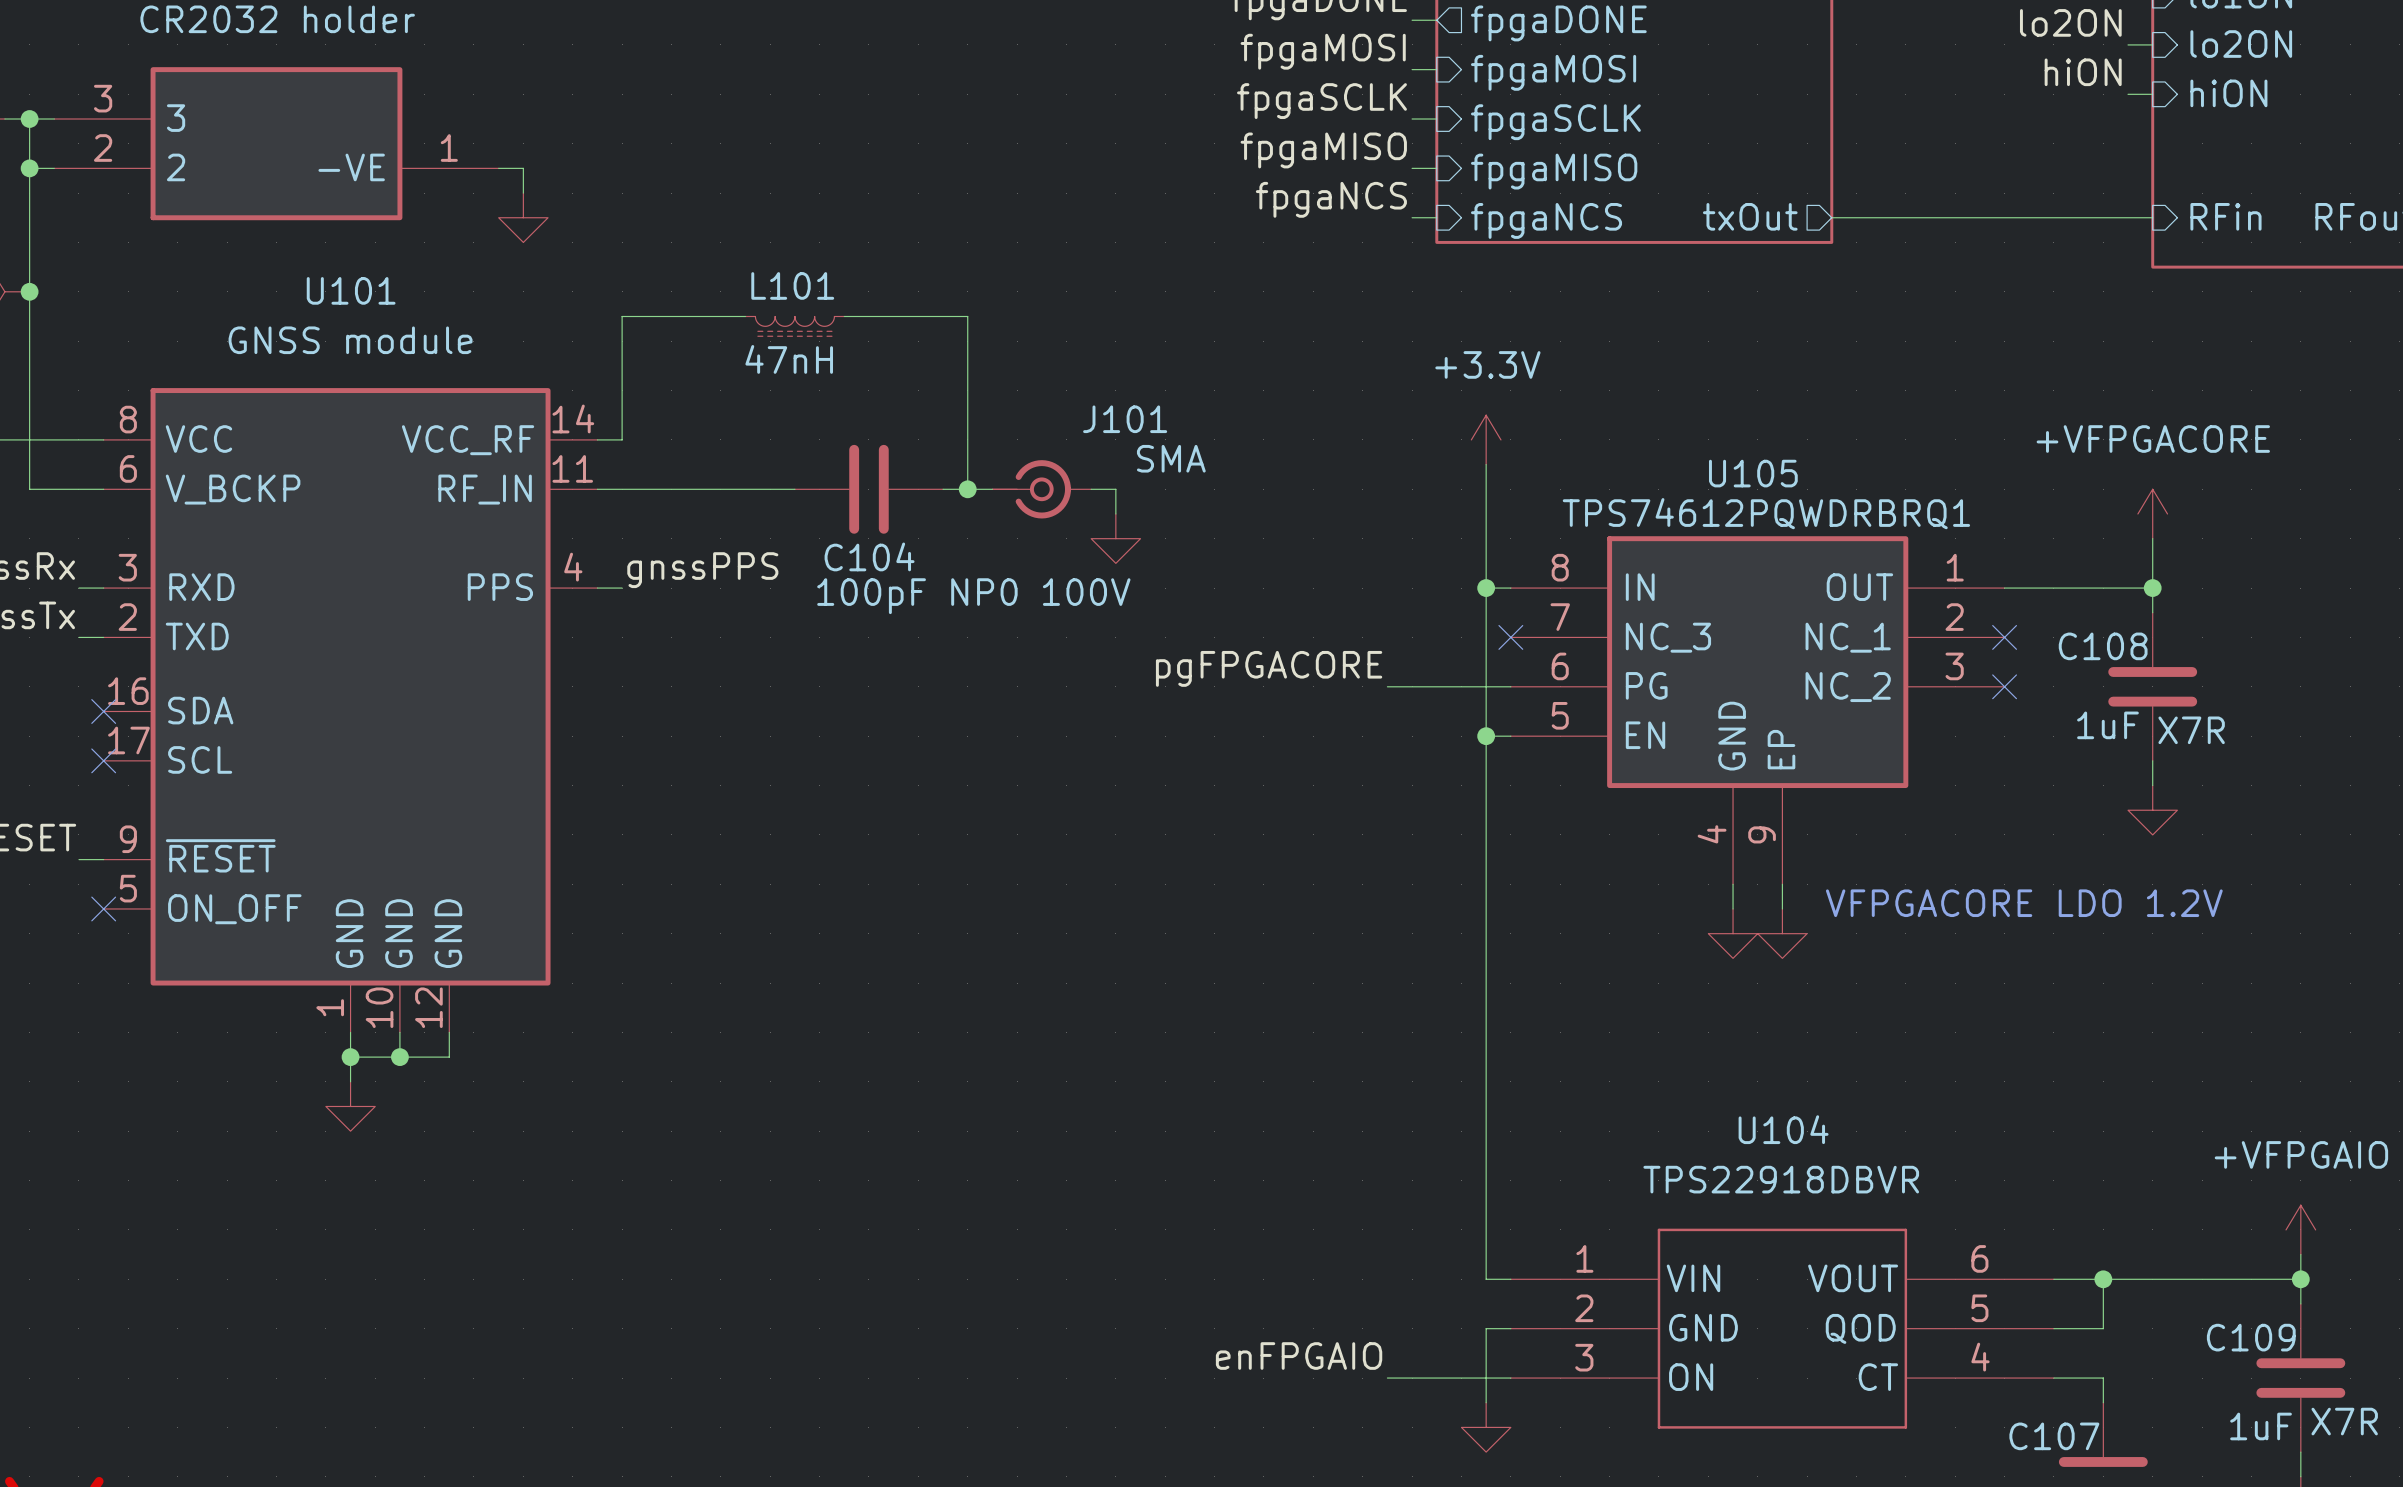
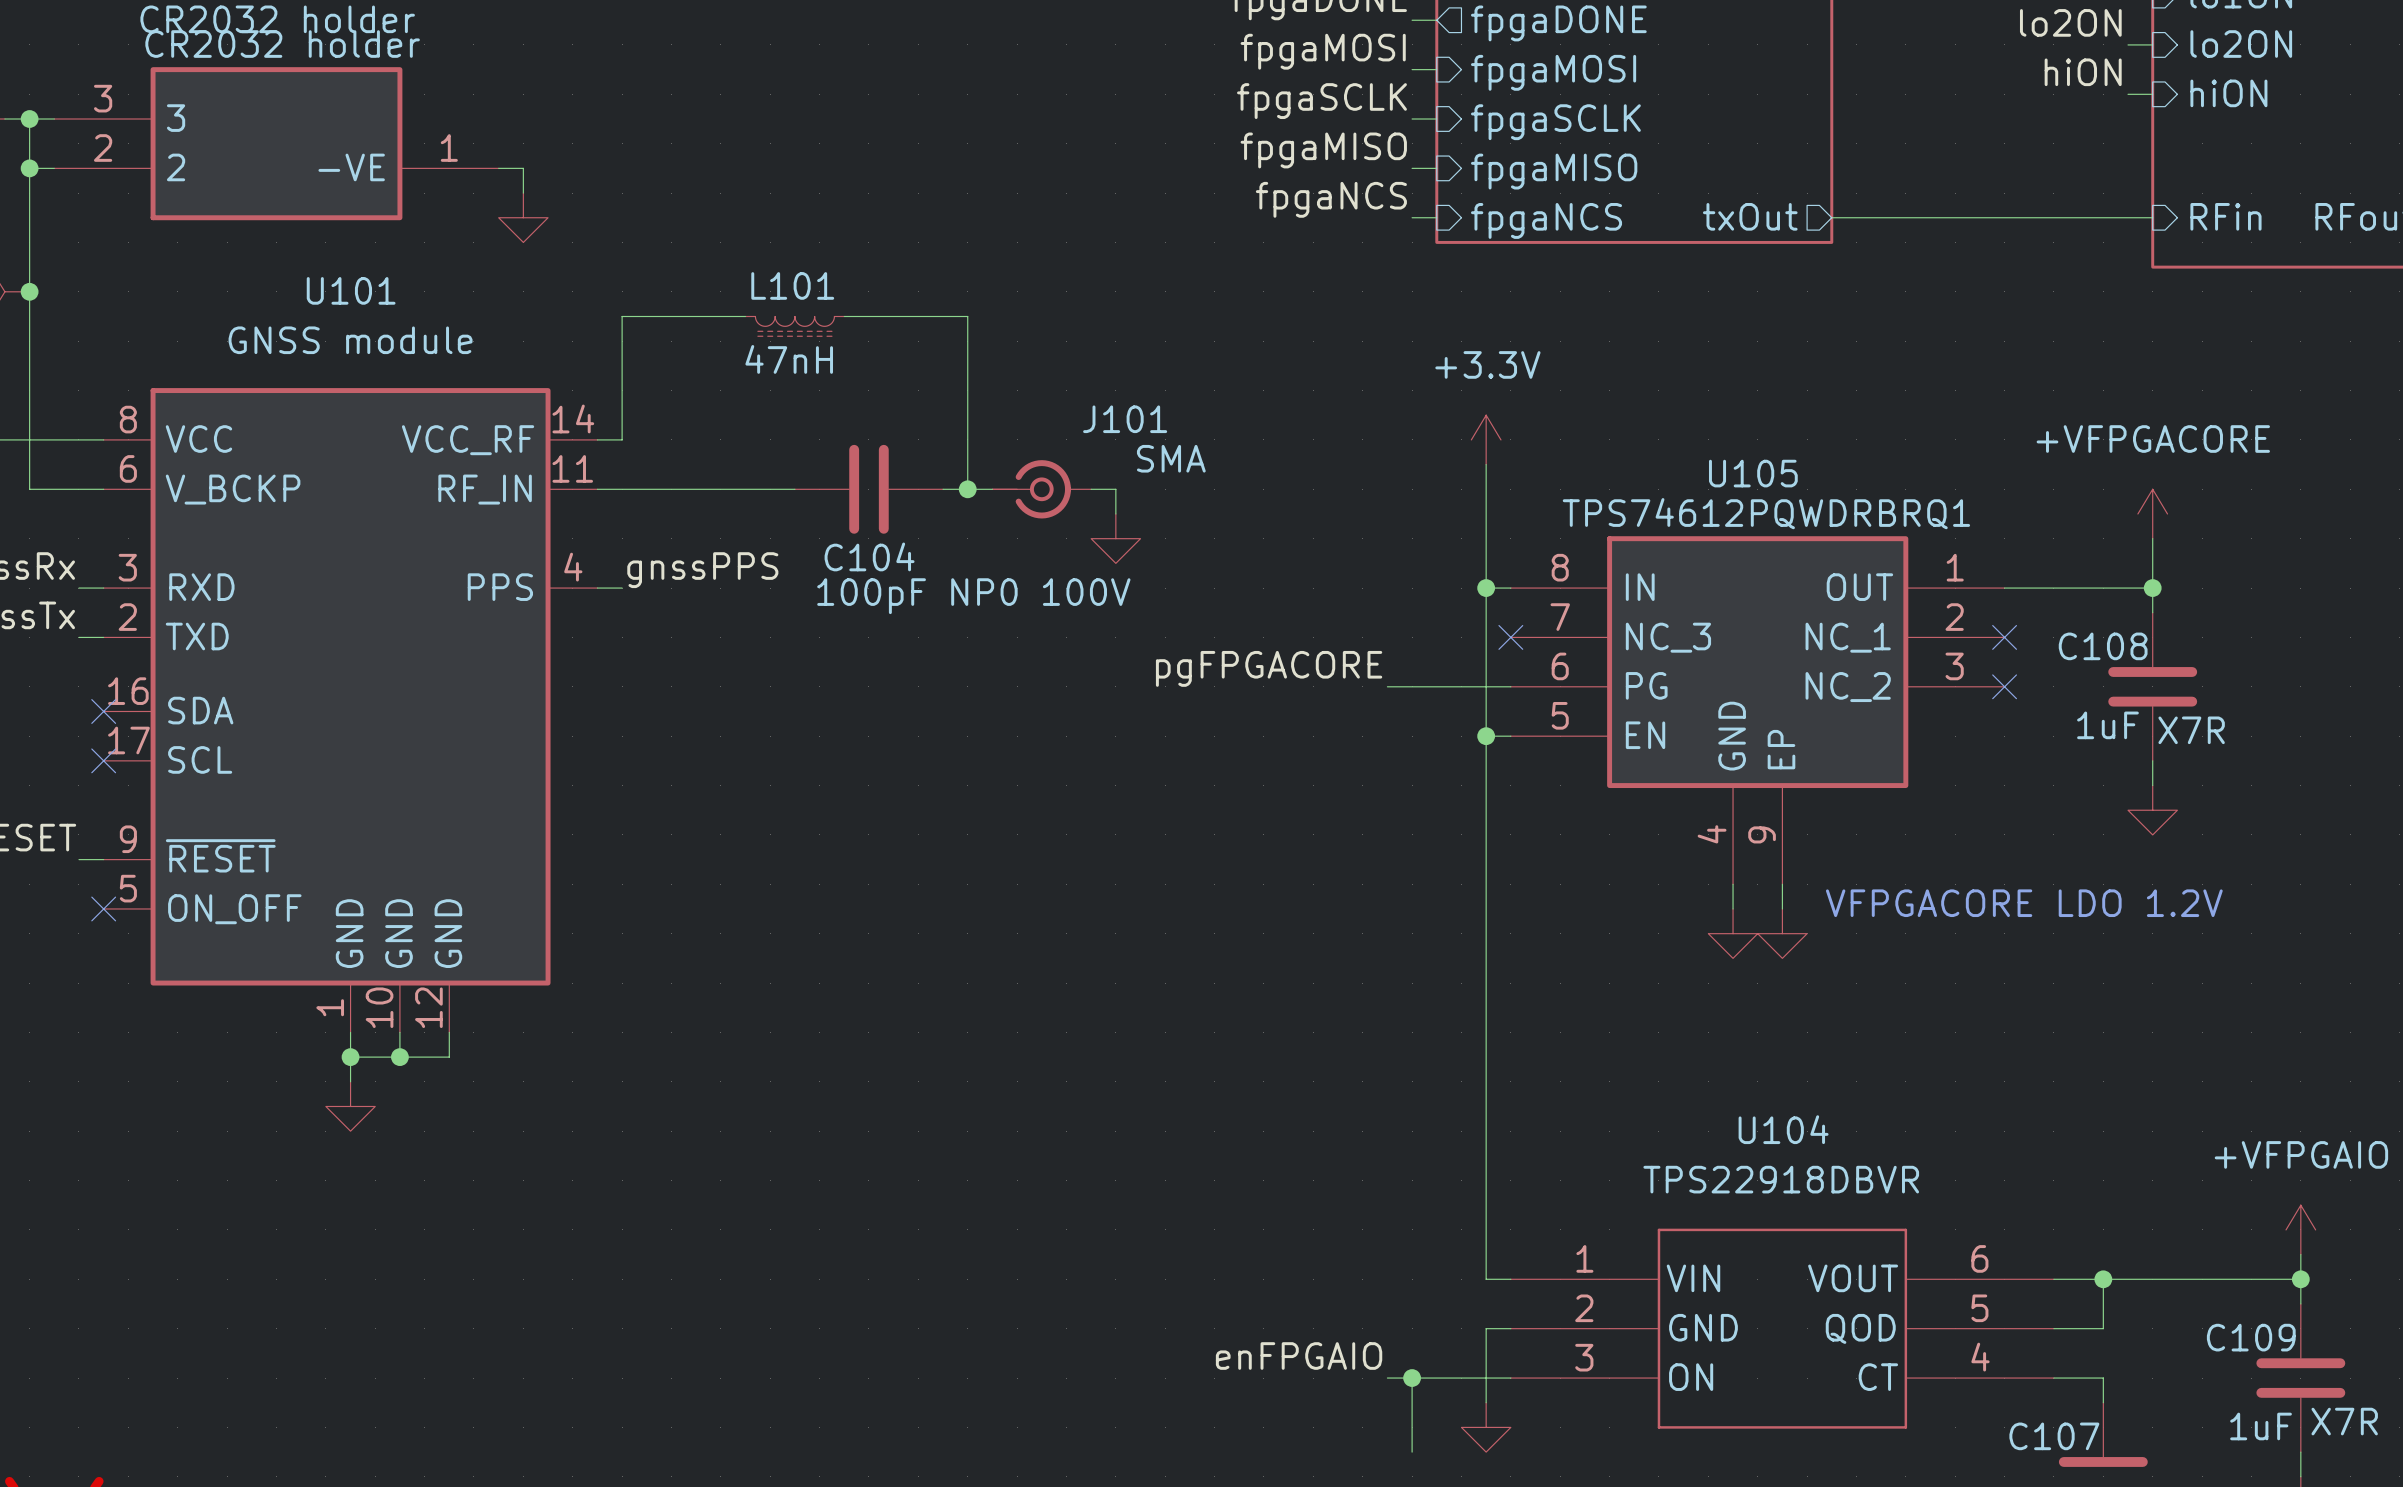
part text: none -> CR2032 holder (282, 44)
wire: none -> (1412, 1378) (1412, 1452)
junction: none -> (1412, 1378)

